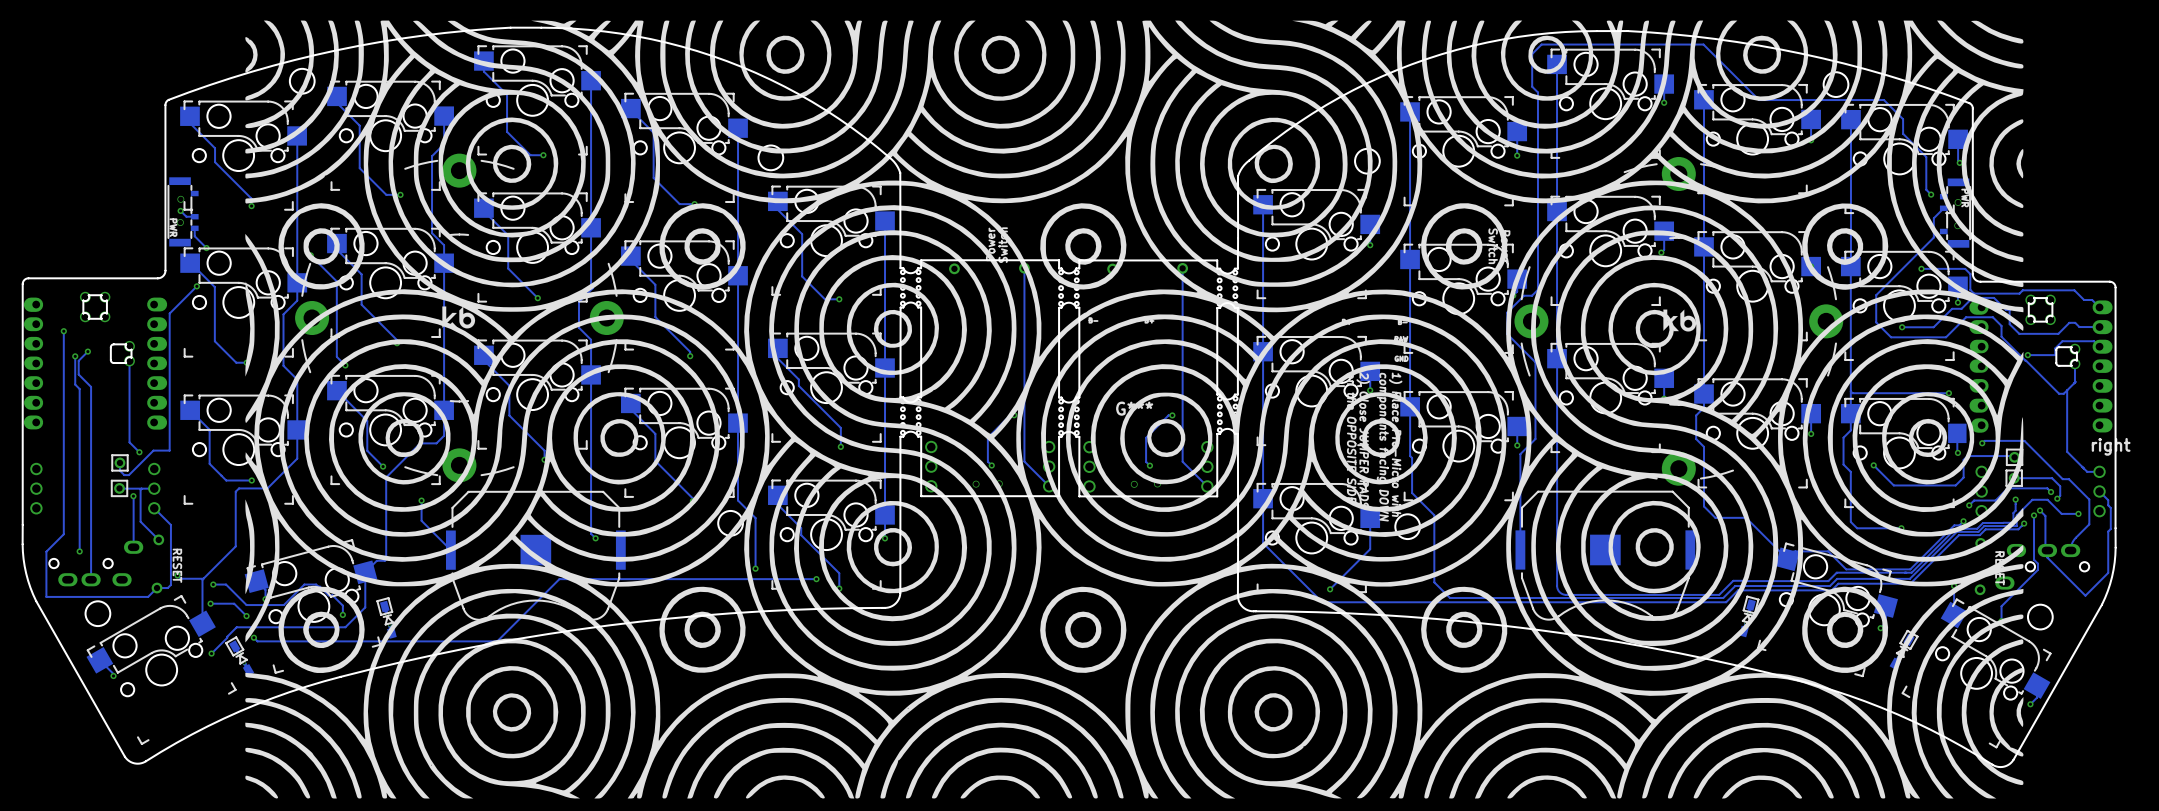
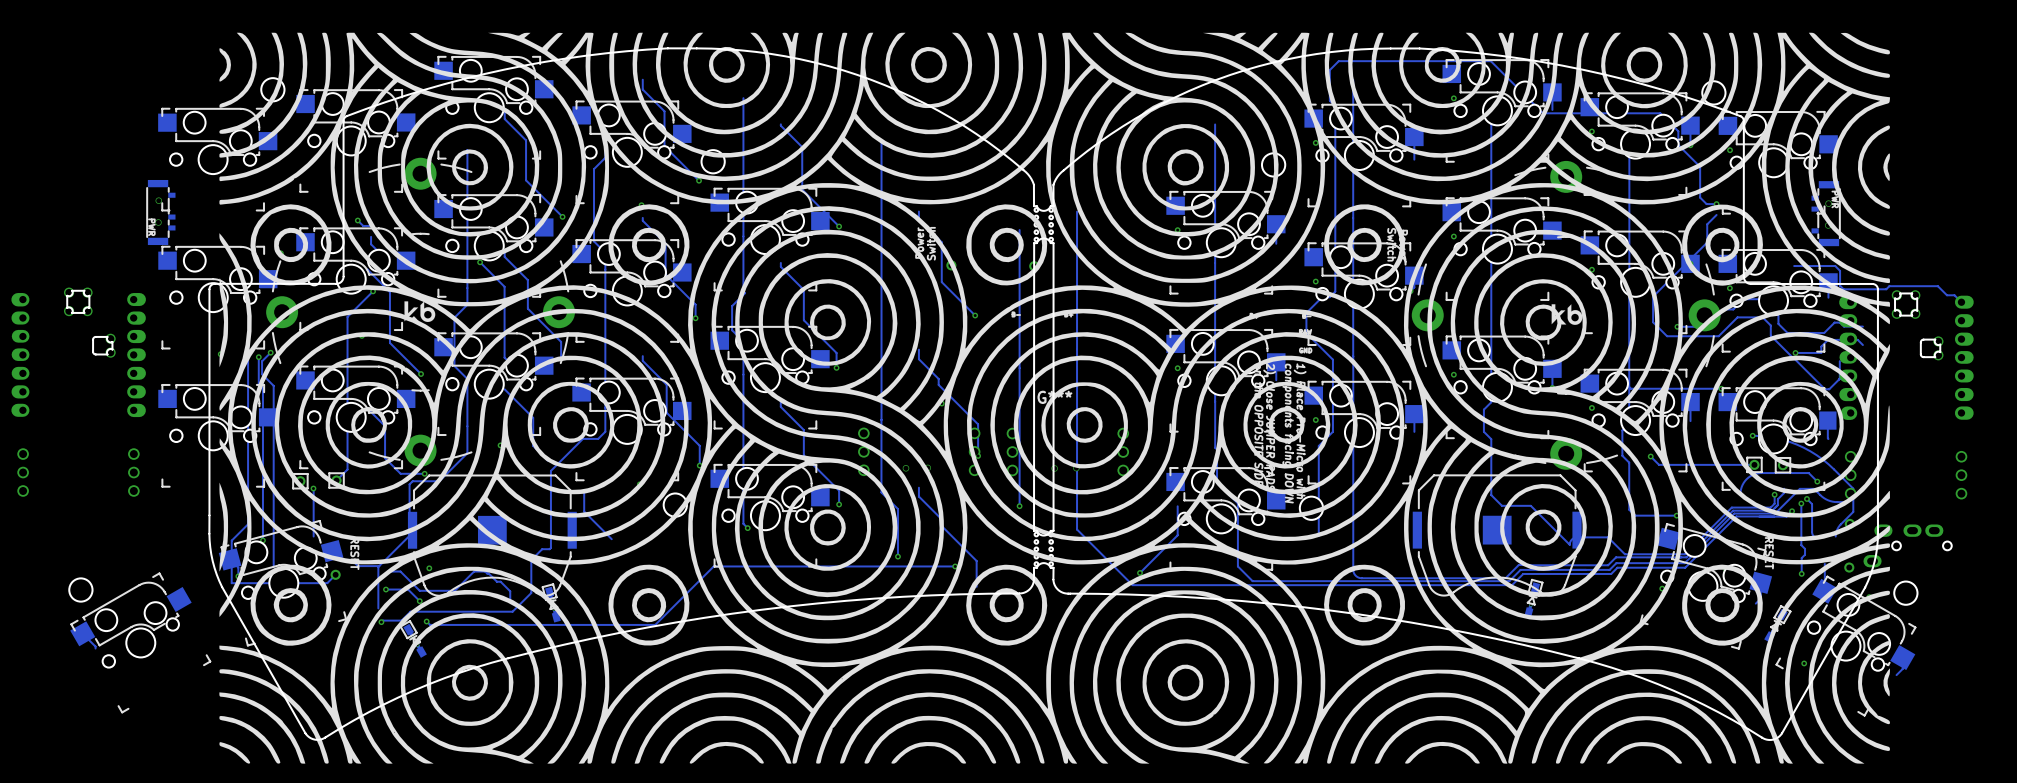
track: (483, 61) (483, 71) (507, 94) (507, 131) (530, 155) (543, 155) -> none
track: (1557, 64) (1557, 358) -> (1353, 79) (1353, 356)
track: none -> (642, 79) (642, 89) (664, 111) (664, 146) (699, 180)
track: (591, 80) (591, 286) (592, 288) (578, 302) (578, 327) (591, 339) (591, 533) (595, 538) -> none
track: none -> (743, 98) (743, 291) (744, 293) (732, 306) (732, 330) (743, 341) (743, 523) (747, 528)
via: none -> (1453, 98)
track: (337, 96) (337, 102) (359, 125) (359, 168) (386, 194) (400, 194) -> none
track: (1704, 99) (1704, 407) (1696, 415) (1696, 439) (1704, 446) (1704, 506) (1715, 517) (1746, 517) (1787, 559) (1789, 554) (1794, 551) (1828, 551) (1846, 569) (1910, 569) (1954, 525) (1959, 525) (1963, 521) -> none
via: (1664, 102) -> none
track: none -> (504, 112) (504, 119) (526, 140) (526, 180) (562, 216)
track: none -> (1491, 113) (1491, 402) (1483, 409) (1483, 431) (1491, 439) (1491, 495) (1501, 505) (1530, 505) (1569, 544) (1571, 540) (1576, 537) (1608, 537) (1624, 554) (1685, 554) (1731, 507) (1770, 507) (1774, 503) (1774, 494)
track: (630, 108) (653, 132) (653, 178) (679, 204) (694, 204) -> none
track: (1410, 111) (1410, 406) -> none
track: (189, 116) (189, 123) (215, 148) (215, 162) (251, 198) (251, 206) -> none
track: (444, 116) (444, 144) (432, 156) (432, 233) (444, 245) (444, 435) (436, 443) (420, 443) (386, 477) (386, 559) (376, 560) (365, 572) (365, 607) (345, 627) (236, 627) (211, 653) -> none
track: none -> (780, 124) (802, 147) (802, 189) (839, 226)
track: none -> (1215, 124) (1215, 447) (1217, 449) (1217, 482) (1237, 503) (1237, 566) (1252, 581) (1509, 581) (1520, 569) (1609, 569) (1616, 563) (1684, 563) (1734, 513) (1775, 513) (1799, 488) (1814, 488) (1828, 500) (1843, 502)
track: (1850, 119) (1850, 430) (1843, 437) (1843, 464) (1850, 471) (1850, 521) (1857, 528) (1901, 528) -> (1629, 131) (1629, 423) (1622, 430) (1622, 455) (1629, 462) (1629, 509) (1635, 515) (1676, 515)
track: none -> (605, 131) (605, 157) (594, 169) (594, 241) (605, 252) (605, 431) (598, 438) (582, 438) (550, 470) (550, 547) (542, 549) (531, 560) (531, 593) (512, 611) (410, 611) (401, 620) (381, 622)
via: none -> (1591, 131)
track: (738, 128) (738, 423) -> none
track: (297, 135) (297, 300) (283, 314) (283, 365) (297, 379) (297, 458) (267, 488) (239, 488) (235, 491) (235, 546) (202, 579) (202, 623) -> none
track: none -> (881, 142) (881, 419)
via: none -> (1315, 142)
track: (1958, 139) (1958, 161) (1959, 162) -> none
track: none -> (467, 150) (467, 304) (454, 317) (454, 366) (467, 378) (467, 453) (439, 481) (412, 481) (409, 484) (409, 535) (378, 566) (378, 608)
via: none -> (1730, 150)
via: (543, 155) -> none
via: (1517, 155) -> none
via: (1959, 162) -> none
via: none -> (699, 180)
via position: (400, 194) -> (357, 220)
track: (1931, 194) (1926, 189) (1926, 157) (1903, 133) (1903, 119) (1883, 100) (1759, 100) (1703, 44) (1541, 44) (1532, 54) (1532, 86) (1537, 92) (1537, 289) (1531, 295) (1524, 295) (1507, 312) (1507, 334) (1535, 362) (1535, 439) (1520, 454) (1520, 549) -> none
via: (1931, 194) -> none
track: (777, 201) (777, 209) (802, 234) (802, 276) (824, 299) (839, 299) -> none
track: none -> (1716, 204) (1706, 204) (1700, 197) (1700, 166) (1678, 145) (1678, 131) (1660, 113) (1542, 113) (1490, 61) (1338, 61) (1329, 70) (1329, 100) (1335, 106) (1335, 291) (1329, 297) (1322, 297) (1306, 312) (1306, 333) (1332, 359) (1332, 431) (1318, 445) (1318, 536)
via: none -> (1716, 204)
track: (1263, 204) (1263, 543) (1322, 602) (1726, 602) (1738, 590) (1831, 590) (1838, 583) (1910, 583) (1958, 535) (1979, 535) -> (1835, 536) (1838, 527) (1849, 516)
via: (251, 206) -> none
track: (483, 208) (483, 211) (508, 235) (508, 268) (537, 298) -> none
track: (1943, 208) (1933, 218) (1933, 237) (1876, 295) (1876, 322) (1891, 337) (1946, 337) (1966, 317) (1992, 317) (2001, 325) (2001, 336) (2059, 393) (2063, 393) (2075, 381) -> (1716, 214) (1707, 224) (1707, 242) (1653, 296) (1653, 322) (1667, 336) (1718, 336) (1737, 317) (1762, 317) (1770, 325) (1770, 335) (1824, 389) (1829, 389) (1840, 378)
track: (180, 210) (186, 216) (194, 216) -> none
via: (180, 210) -> none
track: none -> (918, 211) (918, 219) (941, 242) (941, 282) (975, 315)
track: none -> (1077, 211) (1077, 529) (1132, 585) (1512, 585) (1523, 573) (1611, 573) (1617, 567) (1685, 567) (1736, 516) (1774, 516)
via: none -> (562, 216)
track: none -> (642, 217) (642, 220) (665, 243) (665, 274) (695, 304) (695, 318)
track: none -> (357, 220) (363, 225) (371, 225)
track: (885, 221) (885, 538) -> none
part: none -> (1043, 224)
via: none -> (839, 226)
track: (194, 228) (194, 236) (206, 248) -> none
track: none -> (1019, 230) (1019, 506)
via: none -> (1177, 230)
track: (1664, 231) (1664, 249) (1661, 252) -> none
track: none -> (371, 236) (371, 244) (382, 255)
via: none -> (1453, 236)
track: (336, 243) (336, 249) (361, 274) (361, 304) (397, 340) (397, 343) -> none
board edge: none -> (1053, 243) (1043, 238) (1034, 243) (1034, 530) (1043, 535) (1053, 530) (1053, 243)
via: (1370, 245) -> none
via: (206, 248) -> none
via: (1661, 252) -> none
track: none -> (504, 251) (504, 256) (527, 280) (527, 308) (561, 341) (561, 357)
track: (310, 255) (336, 281) (336, 356) (345, 365) -> none
track: (630, 256) (630, 260) (655, 284) (655, 317) (690, 351) (690, 356) -> none
track: (190, 263) (214, 287) (214, 341) (236, 362) (246, 362) -> none
track: none -> (480, 262) (504, 286) (504, 357) (512, 365)
track: none -> (780, 262) (780, 266) (803, 289) (803, 320) (836, 352) (836, 367)
part: (954, 268) -> none
track: (1024, 268) (1024, 461) (1049, 486) -> none
track: (1182, 268) (1182, 461) (1207, 486) -> none
part: (1182, 268) -> none
board edge: (1234, 268) (1237, 268) (1237, 176) (1246, 162) (1299, 122) (1353, 90) (1411, 64) (1471, 46) (1518, 36) (1581, 31) (1627, 31) (1693, 36) (1758, 45) (1822, 58) (1886, 75) (1948, 95) (1969, 103) (1972, 107) (1972, 273) (1974, 278) (1980, 281) (2109, 281) (2115, 285) (2115, 547) (2113, 569) (2107, 591) (2102, 604) (2013, 759) (2007, 765) (1998, 766) (1930, 729) (1865, 701) (1797, 680) (1708, 659) (1589, 637) (1498, 625) (1377, 614) (1247, 610) (1241, 605) (1237, 596) (1237, 433) (1234, 433) (1230, 429) (1224, 429) (1217, 433) (1217, 496) (1079, 496) (1079, 436) (1068, 431) (1059, 436) (1059, 496) (921, 496) (921, 436) (909, 431) (900, 436) (900, 592) (896, 602) (890, 606) (760, 611) (639, 621) (549, 633) (429, 655) (340, 676) (272, 698) (207, 726) (144, 762) (137, 763) (129, 761) (124, 756) (36, 601) (26, 573) (22, 544) (23, 281) (28, 278) (157, 278) (162, 276) (165, 270) (166, 101) (230, 78) (294, 60) (401, 38) (510, 27) (588, 29) (651, 39) (712, 55) (784, 86) (839, 118) (891, 159) (900, 172) (900, 268) (907, 272) (913, 272) (918, 268) (921, 268) (921, 260) (1059, 260) (1059, 268) (1068, 273) (1079, 268) (1079, 260) (1217, 260) (1217, 268) (1220, 268) (1223, 272) (1230, 273) (1234, 268) -> (1036, 567) (1043, 563) (1053, 567) (1054, 585) (1059, 590) (1066, 593) (1184, 596) (1298, 606) (1411, 622) (1523, 644) (1595, 662) (1642, 678) (1704, 704) (1763, 738) (1774, 739) (1781, 733) (1865, 587) (1874, 561) (1878, 533) (1877, 288) (1872, 283) (1747, 282) (1743, 276) (1742, 117) (1662, 89) (1562, 65) (1460, 51) (1390, 48) (1316, 54) (1258, 66) (1216, 79) (1175, 97) (1110, 134) (1059, 174) (1053, 184) (1053, 206) (1043, 210) (1034, 206) (1033, 184) (1031, 179) (1012, 160) (951, 118) (898, 90) (843, 70) (785, 56) (726, 49) (667, 48) (585, 55) (504, 69) (424, 89) (346, 116) (343, 121) (343, 276) (341, 281) (336, 283) (214, 283) (209, 287) (209, 533) (212, 561) (222, 587) (305, 733) (312, 739) (323, 738) (368, 712) (429, 684) (476, 667) (535, 651) (647, 627) (789, 606) (902, 596) (1021, 593) (1031, 586) (1034, 567) (1036, 567)
via: (1921, 268) -> none
track: none -> (366, 269) (389, 292) (389, 342) (421, 374)
via: none -> (1591, 269)
via: none -> (1315, 281)
track: (196, 286) (169, 313) (169, 450) (153, 450) (128, 475) (124, 475) (119, 470) (119, 462) -> none
via: (196, 286) -> none
part: (910, 287) -> none
part: (1068, 288) -> none
part: (1227, 288) -> none
via: none -> (1729, 288)
track: none -> (373, 291) (347, 316) (347, 469) (336, 480)
via: none -> (373, 291)
via position: (537, 298) -> (480, 262)
via: (839, 299) -> none
via: (1957, 302) -> none
board edge: (921, 307) (921, 397) (909, 402) (900, 397) (900, 307) (910, 302) (921, 307) -> none
board edge: (1079, 307) (1068, 302) (1059, 307) (1059, 397) (1067, 402) (1079, 397) (1079, 307) -> none
board edge: (1234, 307) (1237, 307) (1237, 394) (1234, 394) -> none
board edge: (1234, 307) (1227, 302) (1217, 308) (1217, 394) (1227, 399) (1234, 394) -> none
via: none -> (975, 315)
via: none -> (695, 318)
via: (1902, 327) -> none
track: (2099, 327) (2079, 327) (2075, 322) (2069, 322) (2058, 333) (2019, 333) (2009, 324) (2009, 310) (2006, 310) (1994, 297) (1972, 297) (1961, 308) (1952, 308) (1933, 327) (1902, 327) -> (1862, 326) (1844, 326) (1840, 322) (1834, 322) (1824, 332) (1787, 332) (1778, 323) (1778, 310) (1775, 310) (1763, 299) (1743, 299) (1733, 309) (1724, 309) (1707, 326) (1677, 326)
track: (63, 331) (63, 534) (46, 551) (46, 596) (148, 596) (157, 588) (167, 588) (170, 584) (170, 524) (154, 508) -> none
via: (63, 331) -> none
via: none -> (1677, 326)
track: none -> (248, 333) (248, 524) (231, 540) (231, 583) (327, 583) (335, 574)
track: (2099, 346) (2094, 341) (2062, 341) (2055, 348) (2055, 355) (2027, 355) -> (1862, 345) (1857, 339) (1828, 339) (1821, 346) (1821, 352) (1795, 352)
track: (777, 348) (777, 358) (798, 379) (798, 385) (840, 427) (840, 446) -> none
track: (87, 351) (78, 360) (78, 374) (91, 386) (91, 579) -> none
via: (87, 351) -> none
track: (483, 355) (483, 360) (509, 385) (509, 415) (544, 450) (544, 459) -> none
via: (2027, 355) -> none
track: (75, 356) (75, 384) (79, 389) (79, 551) -> none
via: (75, 356) -> none
via: (690, 356) -> none
track: none -> (918, 349) (918, 359) (938, 378) (938, 384) (978, 424) (978, 455)
track: (1557, 358) (1557, 585) (1559, 591) (1563, 594) (1719, 594) (1733, 580) (1828, 581) (1836, 572) (1911, 572) (1955, 528) (1977, 528) (1983, 522) (2002, 522) -> none
track: (129, 361) (129, 442) (139, 452) -> none
track: none -> (270, 352) (262, 361) (262, 374) (273, 385) (273, 567)
via: none -> (270, 352)
via: none -> (1795, 352)
track: (2074, 363) (2074, 382) -> (1839, 361) (1839, 378)
track: none -> (642, 356) (642, 360) (666, 384) (666, 412) (699, 445) (699, 465)
track: none -> (258, 357) (258, 383) (262, 387) (262, 540)
via: none -> (258, 357)
via: (345, 365) -> none
track: none -> (1353, 356) (1353, 569) (1354, 574) (1359, 577) (1505, 578) (1518, 564) (1608, 565) (1616, 557) (1686, 557) (1733, 510) (1772, 510) (1777, 505)
via: none -> (836, 367)
via: none -> (1177, 368)
via: none -> (421, 374)
via: none -> (1453, 374)
track: (336, 390) (367, 420) (367, 450) (383, 466) -> none
via: (1370, 390) -> none
track: (2067, 390) (2067, 451) (2087, 471) (2099, 471) -> none
track: (1850, 391) (1852, 393) (1948, 393) -> (1629, 387) (1630, 388) (1721, 388)
via: (1948, 393) -> none
via: none -> (1721, 388)
track: none -> (504, 389) (533, 417) (533, 445) (548, 460)
track: (630, 403) (630, 409) (655, 433) (655, 460) (692, 498) (692, 501) -> none
track: (1410, 406) (1412, 493) (1434, 515) (1434, 582) (1449, 598) (1723, 598) (1735, 586) (1829, 586) (1837, 578) (1909, 578) (1956, 531) (1978, 531) (1984, 526) (2016, 526) -> none
track: (190, 410) (209, 429) (209, 463) (226, 480) (251, 480) -> none
track: none -> (780, 401) (780, 406) (803, 430) (803, 455) (839, 490) (839, 504)
part: (1227, 414) -> none
track: (1014, 415) (1010, 415) (987, 437) (987, 461) (991, 465) -> none
track: (1172, 415) (1168, 415) (1146, 437) (1146, 461) (1149, 465) -> none
via: (1172, 415) -> none
part: (910, 417) -> none
part: (1068, 417) -> none
track: none -> (366, 407) (385, 426) (385, 458) (400, 473) (424, 473)
via: none -> (1591, 407)
track: (737, 423) (737, 500) (755, 518) (755, 568) -> none
track: none -> (881, 419) (881, 492) (897, 509) (897, 556)
via: none -> (1315, 420)
via: (1811, 433) -> none
track: (1982, 443) (1984, 440) (2024, 440) (2062, 479) (2068, 479) (2089, 499) (2089, 524) (2073, 540) (2070, 550) -> none
via: (1982, 443) -> none
via: (1517, 445) -> none
via: (840, 446) -> none
text: right (2111, 446) -> none
via: (139, 452) -> none
via: (1957, 452) -> none
track: (2013, 456) (1967, 456) (1963, 459) (1963, 477) (1955, 485) (1893, 485) (1873, 465) -> none
part: (2014, 457) -> none
part: (119, 462) -> none
via: (991, 465) -> none
via: (1149, 465) -> none
via position: (1873, 465) -> (1752, 435)
via: (383, 466) -> none
via: none -> (978, 455)
track: none -> (1650, 456) (1659, 464) (1754, 464)
via: none -> (1650, 456)
track: (2014, 478) (2052, 478) (2060, 486) (2060, 495) (2057, 498) -> none
part: (2014, 478) -> none
via: (251, 480) -> none
part: none -> (1754, 464)
part: none -> (1782, 465)
via: none -> (699, 465)
track: (119, 488) (154, 488) -> none
part: (119, 488) -> none
track: (141, 488) (140, 521) (158, 539) -> none
via: none -> (424, 473)
track: (2099, 491) (2108, 500) (2108, 505) (2110, 507) (2110, 528) (2108, 531) (2108, 572) (2085, 595) (2047, 557) (2045, 515) (2040, 510) -> none
track: (2051, 492) (2047, 488) (2007, 488) (1995, 500) (1974, 500) (1969, 505) -> none
via: (2051, 492) -> none
track: (777, 495) (777, 504) (801, 528) (801, 535) (839, 573) (839, 588) -> none
track: (133, 496) (133, 547) -> none
via: (133, 496) -> none
part: none -> (300, 481)
part: none -> (336, 480)
track: none -> (1817, 481) (1808, 473) (1759, 473) (1750, 476) (1745, 480) (1740, 494)
via: none -> (1817, 481)
via: (2057, 498) -> none
track: (2015, 499) (2013, 521) (2003, 522) -> none
via: (2015, 499) -> none
track: (421, 500) (421, 520) (450, 550) -> none
via: (421, 500) -> none
track: none -> (918, 487) (918, 496) (940, 518) (940, 525) (976, 560) (976, 586)
track: none -> (313, 488) (313, 536)
via: none -> (313, 488)
track: none -> (1784, 488) (1784, 493) (1777, 499) (1777, 505) (1774, 508)
via: (1969, 505) -> none
track: none -> (584, 492) (584, 511) (611, 539)
via: (2040, 510) -> none
via: none -> (1774, 494)
track: (2078, 513) (2061, 513) (2047, 499) (2032, 499) (2016, 515) (2016, 525) -> none
via: (2078, 513) -> none
track: (2034, 515) (2034, 559) (2037, 563) (2037, 569) (2001, 606) (2001, 621) -> none
via: (2034, 515) -> none
track: none -> (1806, 498) (1812, 504) (1812, 532) (1813, 536)
via: none -> (1806, 498)
track: (1370, 518) (1370, 549) (1330, 589) -> (1177, 506) (1177, 535) (1139, 572)
track: none -> (1801, 503) (1801, 545) (1805, 548) (1805, 554) (1801, 558) (1801, 573)
via: none -> (1801, 503)
via: (1963, 521) -> none
track: (2024, 523) (2018, 529) (1984, 530) -> (1752, 435) (1789, 441) (1822, 459) (1853, 488) (1853, 511)
via: (2024, 523) -> none
via: none -> (1019, 506)
via: (1901, 528) -> none
track: none -> (1792, 511) (1786, 516) (1759, 516)
via: none -> (1792, 511)
via: none -> (1676, 515)
via: (595, 538) -> none
via position: (885, 538) -> (839, 504)
part: (158, 539) -> none
via: none -> (747, 528)
via: (79, 551) -> none
via: none -> (262, 540)
part: (96, 563) -> none
part: (177, 565) -> none
via: (755, 568) -> none
part position: (1999, 568) -> (1769, 553)
part: none -> (1043, 549)
track: (177, 575) (180, 578) (203, 578) -> none
via: (177, 575) -> none
part: none -> (354, 553)
via: none -> (897, 556)
track: (816, 579) (559, 579) (497, 641) (257, 641) (253, 637) -> none
via: (816, 579) -> none
track: (213, 584) (226, 584) (246, 605) (283, 605) (304, 584) (316, 584) (328, 595) (332, 595) (342, 605) (342, 614) -> none
via: (213, 584) -> none
track: none -> (354, 563) (357, 566) (379, 566)
via position: (1954, 585) -> (1801, 573)
part: (157, 588) -> none
via: (839, 588) -> none
track: none -> (955, 566) (713, 566) (655, 624) (430, 624) (426, 621)
via: none -> (955, 566)
via: (1330, 589) -> none
via: none -> (429, 568)
track: none -> (388, 571) (400, 571) (419, 590) (454, 590) (474, 571) (485, 571) (496, 581) (500, 581) (510, 591) (510, 600)
via: none -> (1139, 572)
part: none -> (335, 574)
track: (210, 603) (234, 603) (246, 616) -> none
via: (210, 603) -> none
via: none -> (1662, 588)
track: none -> (385, 589) (408, 589) (419, 601)
via: none -> (385, 589)
via: (342, 614) -> none
via: (246, 616) -> none
part position: (1749, 616) -> (1533, 598)
part: (386, 618) -> none
via: none -> (419, 601)
part: none -> (551, 603)
via: (1880, 628) -> none
via: (253, 637) -> none
via: none -> (381, 622)
via: none -> (426, 621)
via: (211, 653) -> none
part: (239, 656) -> none
part: none -> (413, 639)
via: (113, 676) -> none
via: none -> (1804, 663)
via: (2030, 704) -> none

